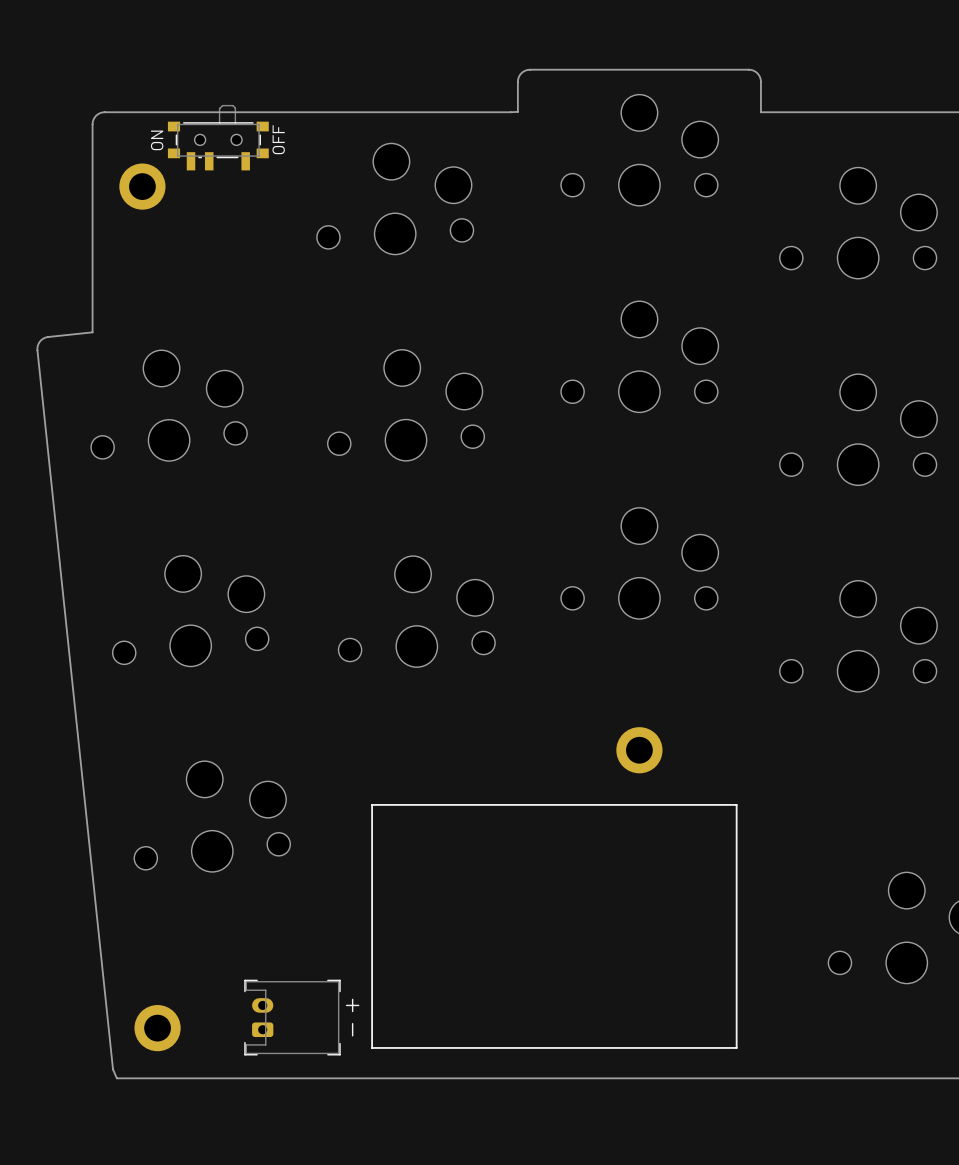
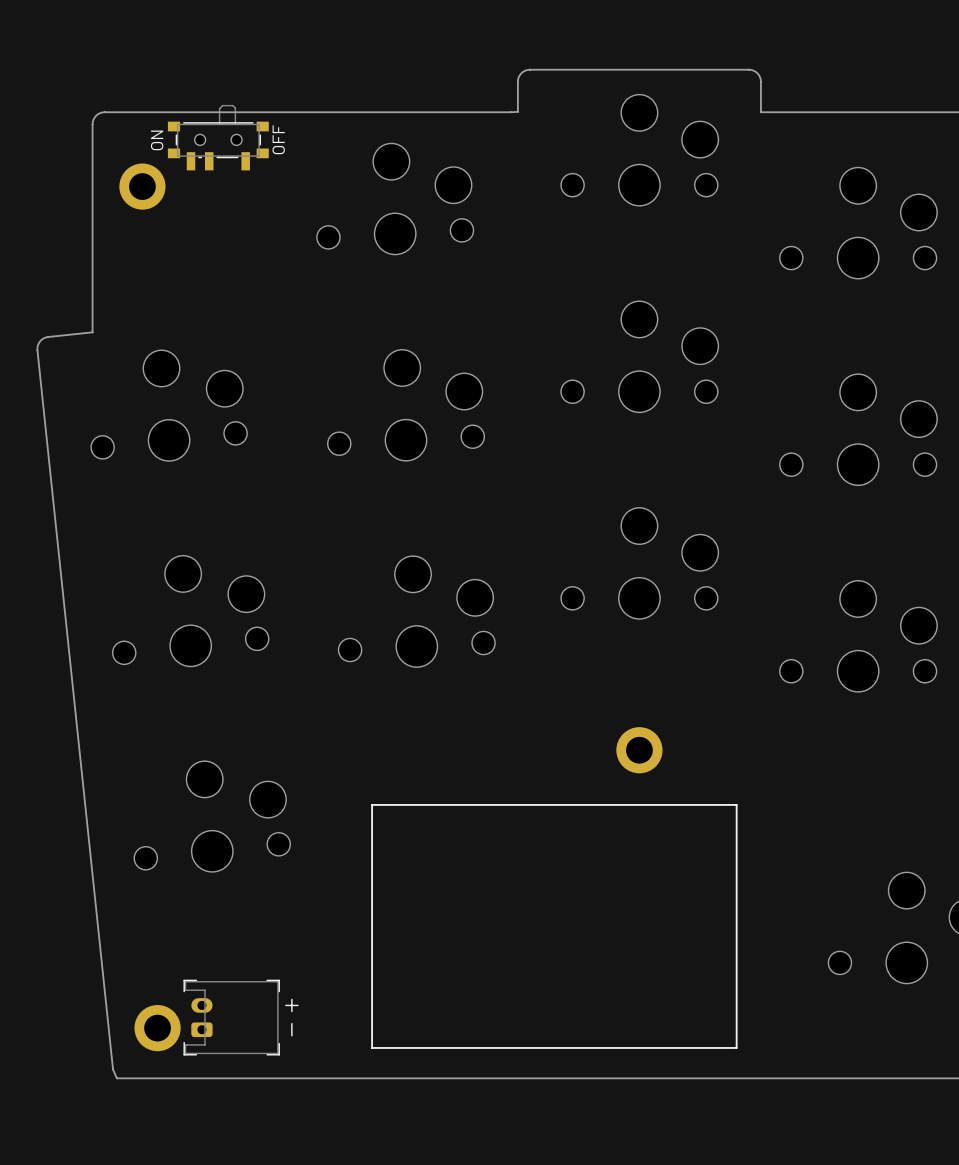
part position: (301, 1017) -> (241, 1017)

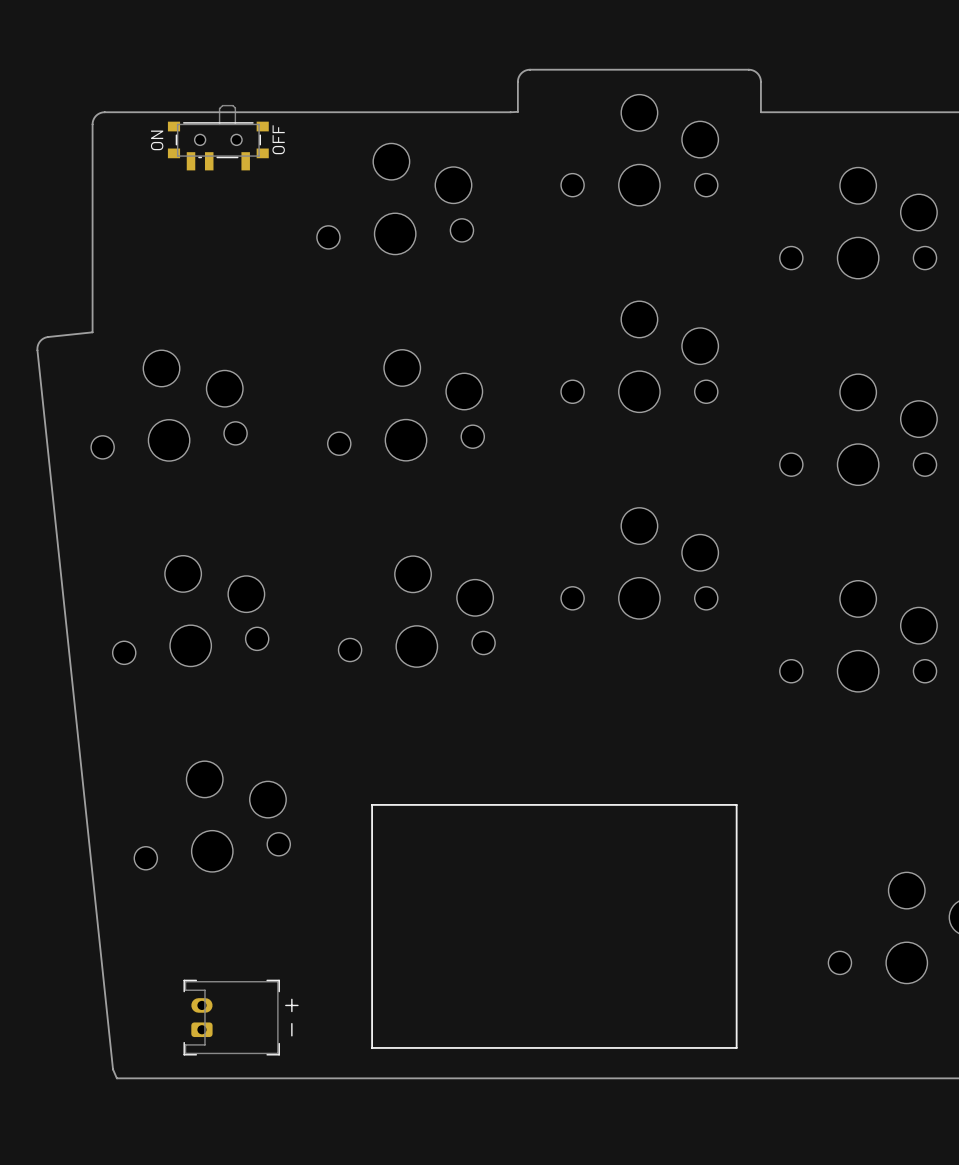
part: (142, 186) -> none
part: (639, 750) -> none
part: (157, 1028) -> none

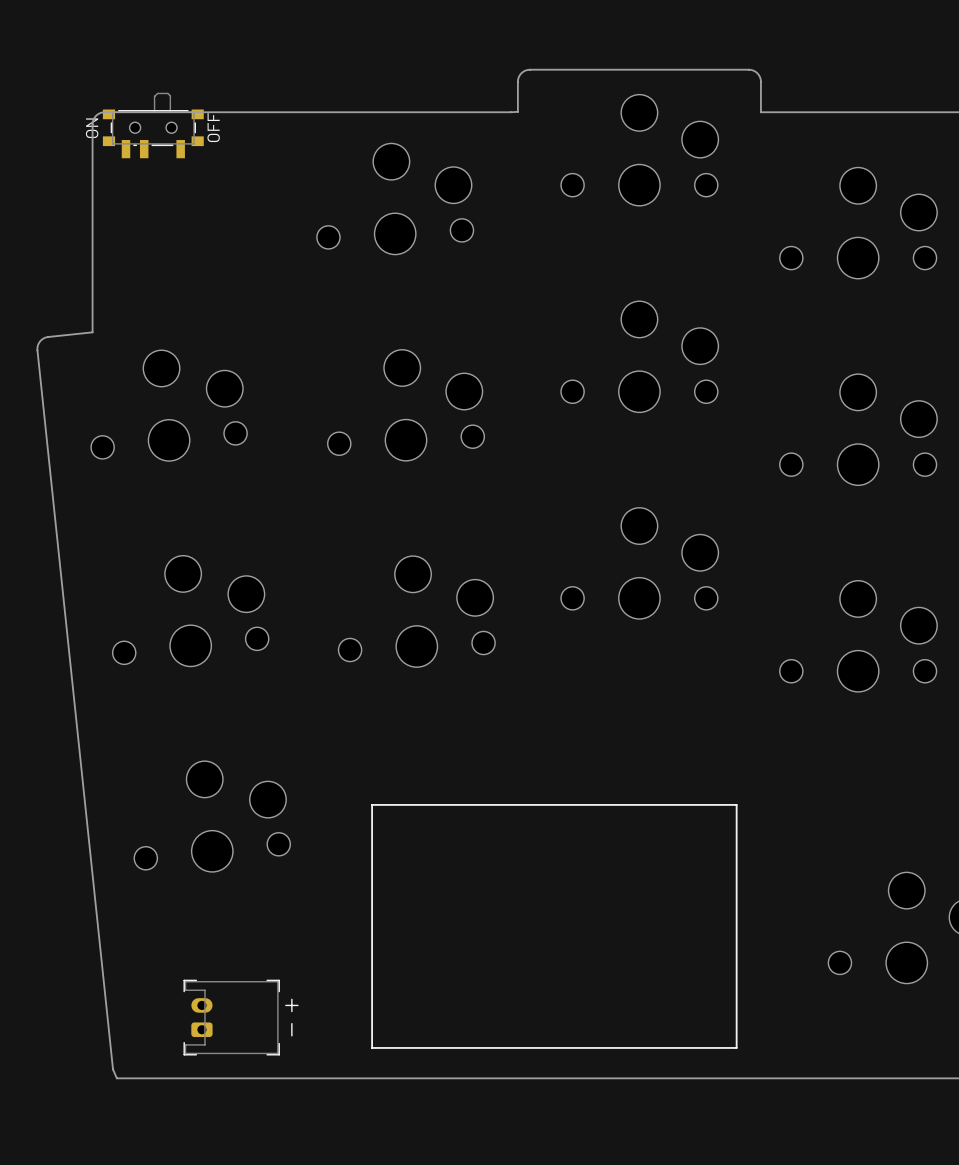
part position: (218, 137) -> (153, 125)

